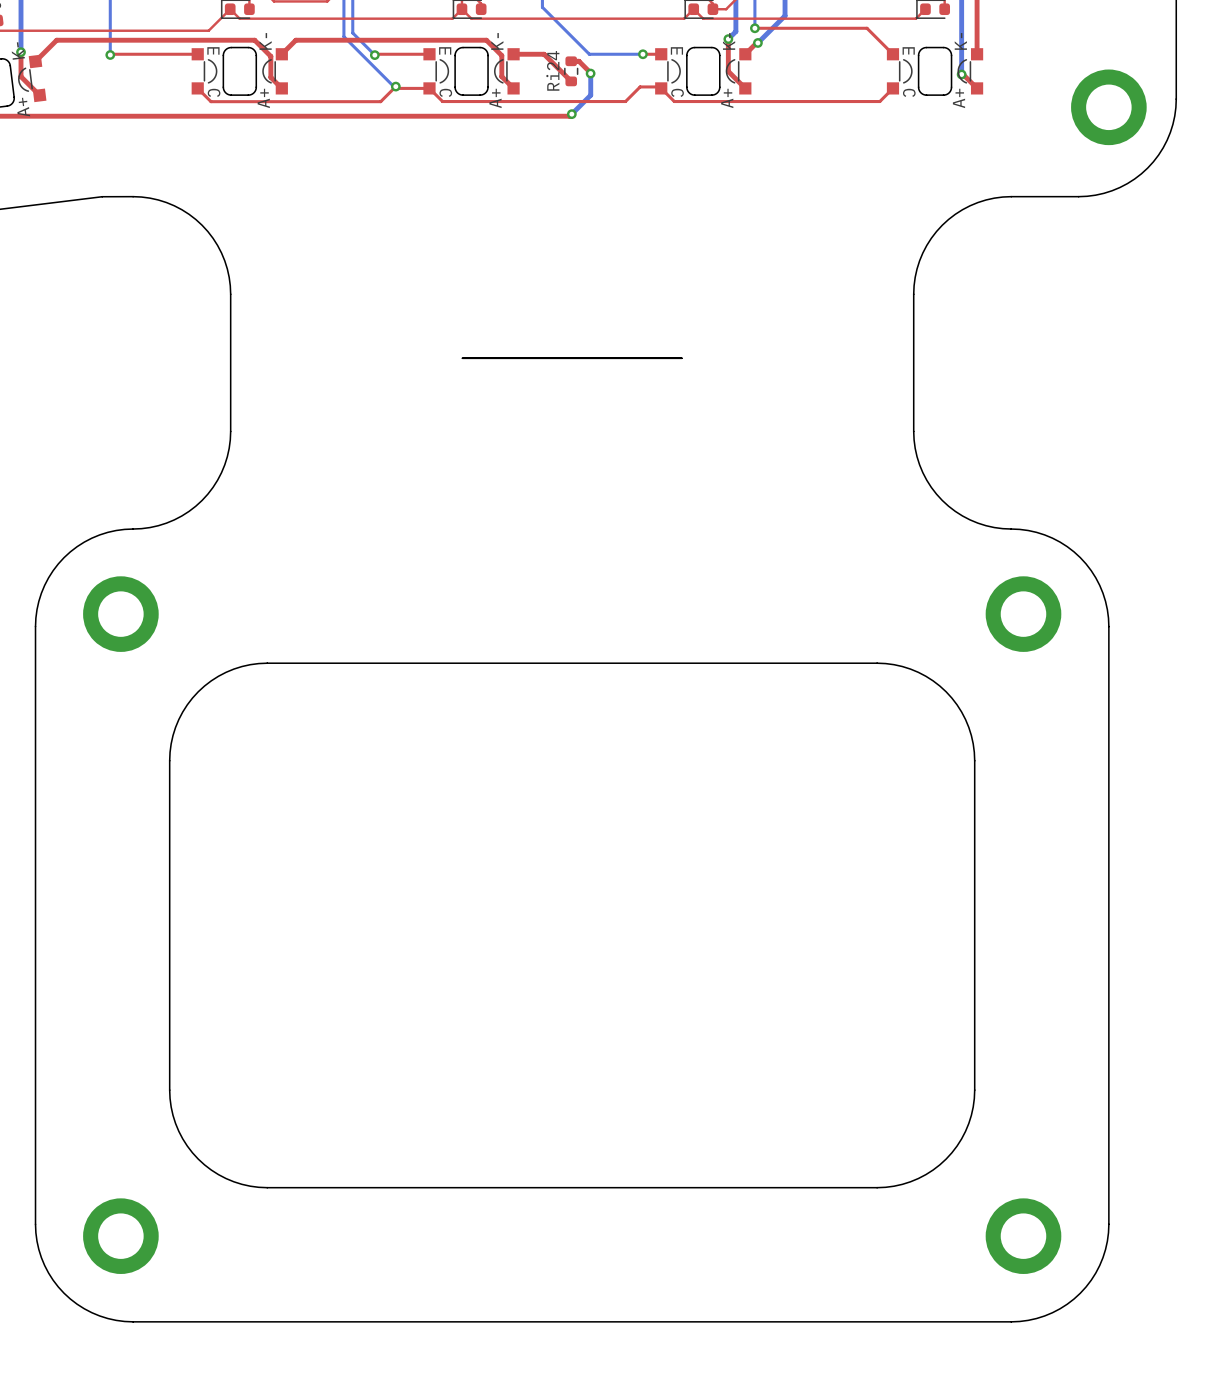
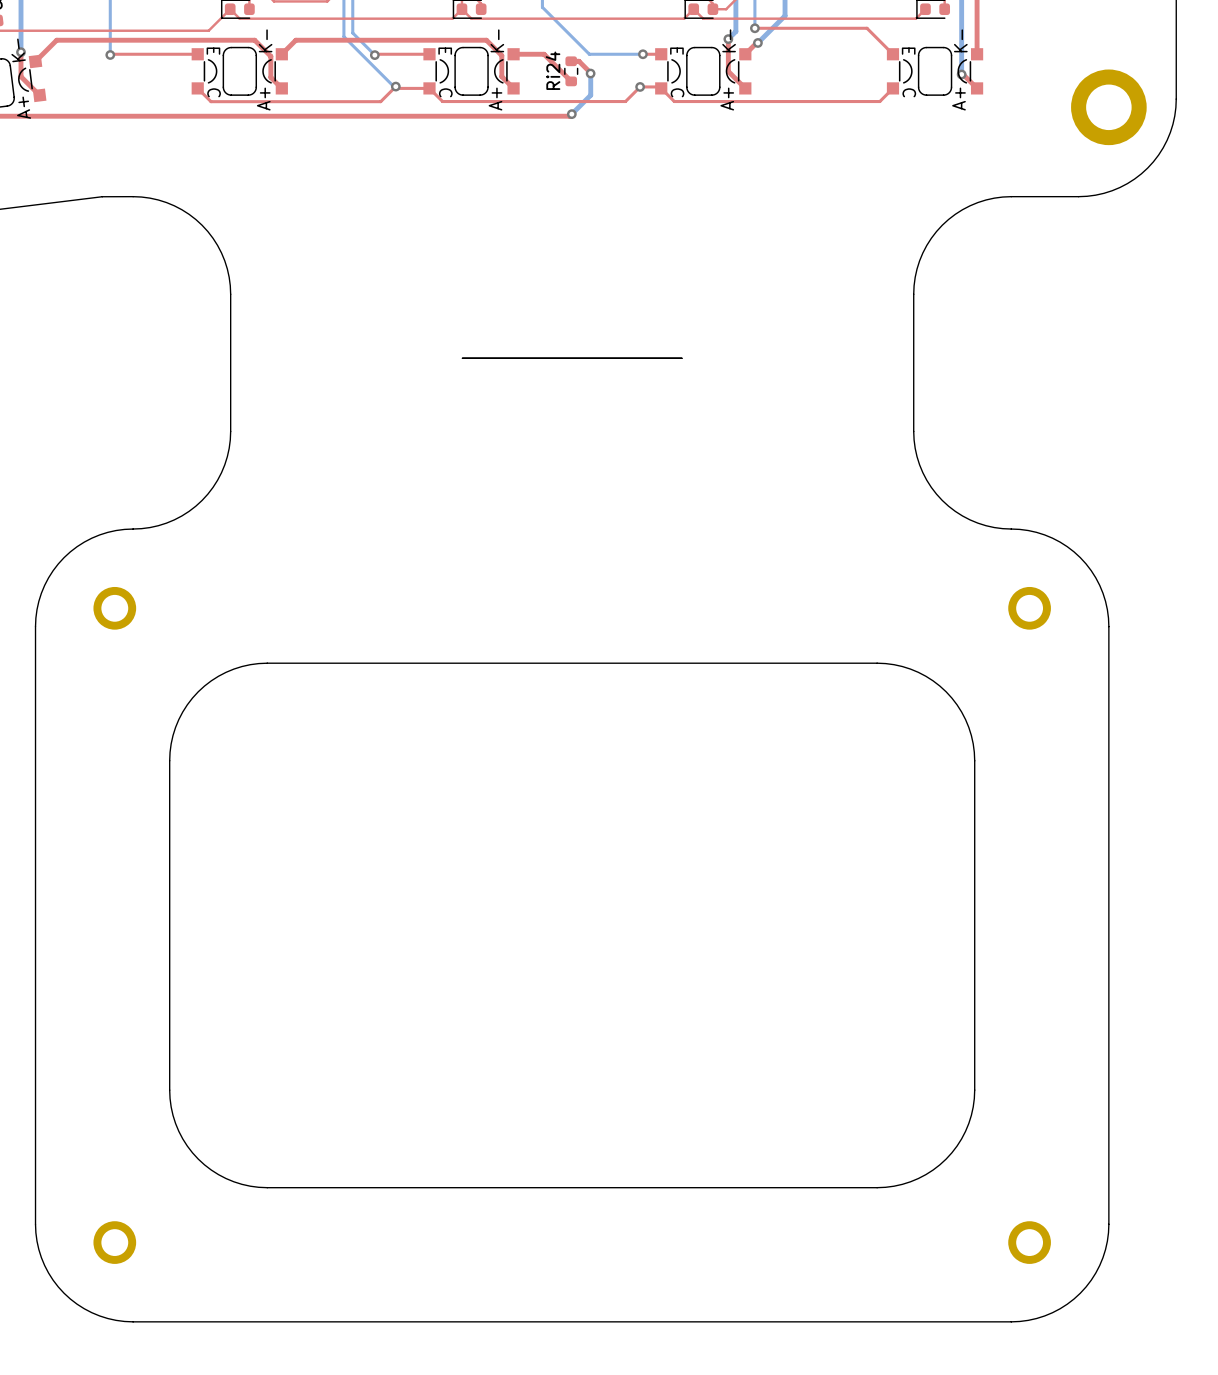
via: none -> (640, 86)
part footprint: [83, 576, 159, 652] -> [93, 586, 137, 630]
part footprint: [985, 576, 1062, 652] -> [1008, 586, 1051, 630]
part footprint: [83, 1198, 159, 1274] -> [93, 1221, 137, 1264]
part footprint: [985, 1198, 1062, 1274] -> [1008, 1221, 1051, 1264]

